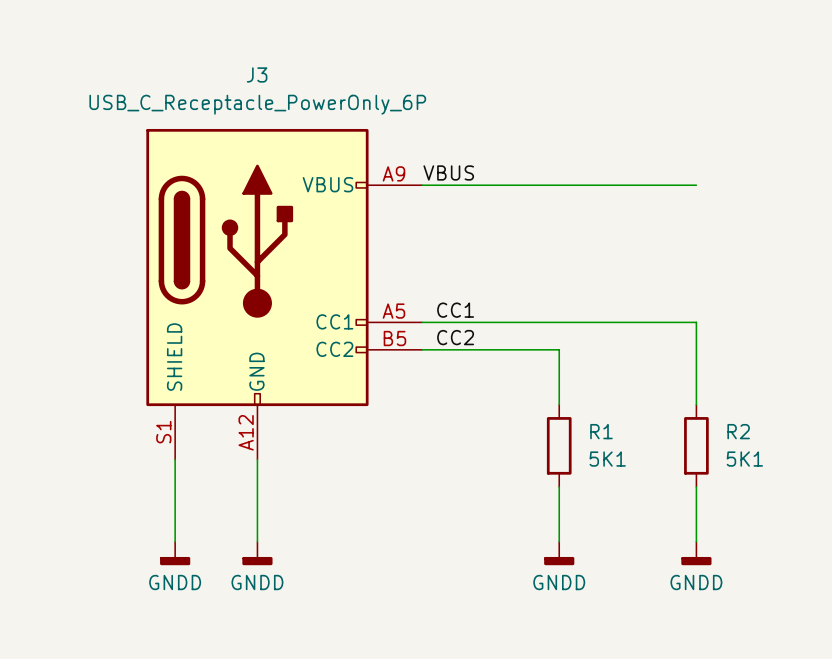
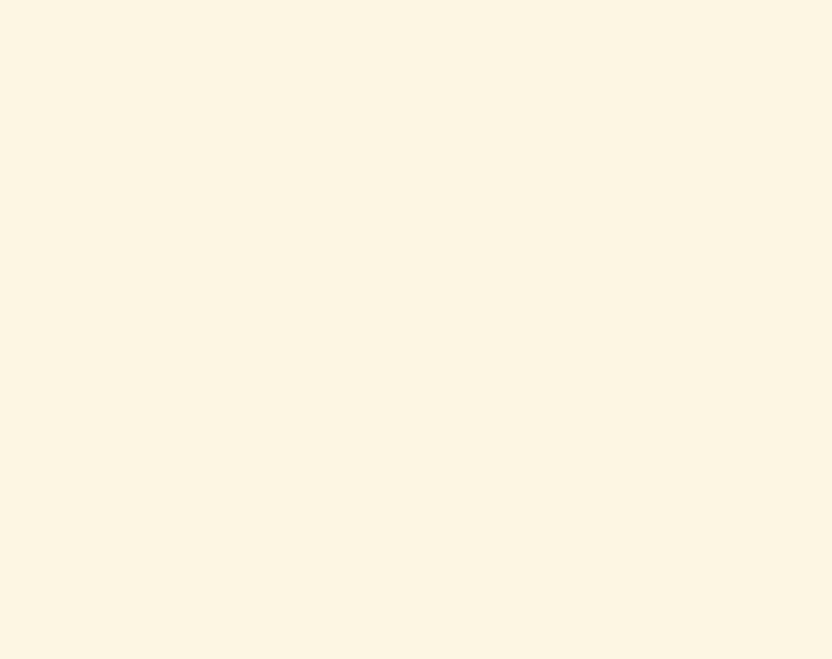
label: VBUS (448, 172) -> none
wire: (422, 185) (696, 185) -> none
J3: USB_C_Receptacle_PowerOnly_6P (284, 294) -> none
label: CC1 (455, 310) -> none
wire: (422, 322) (696, 322) (696, 404) -> none
label: CC2 (455, 337) -> none
wire: (422, 349) (559, 349) (559, 404) -> none
R1: 5K1 (559, 445) -> none
R2: 5K1 (696, 445) -> none
wire: (175, 459) (175, 541) -> none
wire: (257, 459) (257, 541) -> none
wire: (559, 487) (559, 541) -> none
wire: (696, 487) (696, 541) -> none
power symbol: GNDD (175, 553) -> none
power symbol: GNDD (257, 553) -> none
power symbol: GNDD (559, 553) -> none
power symbol: GNDD (696, 553) -> none

